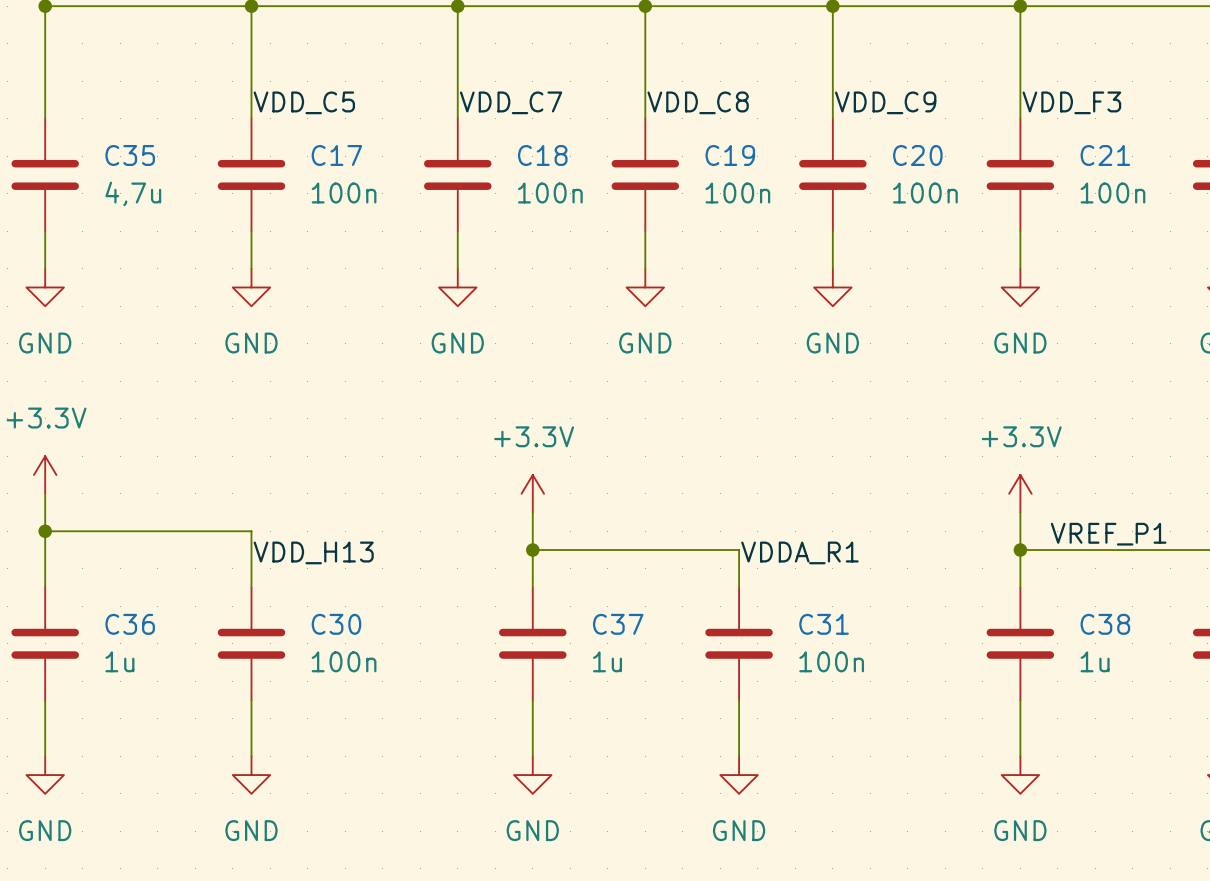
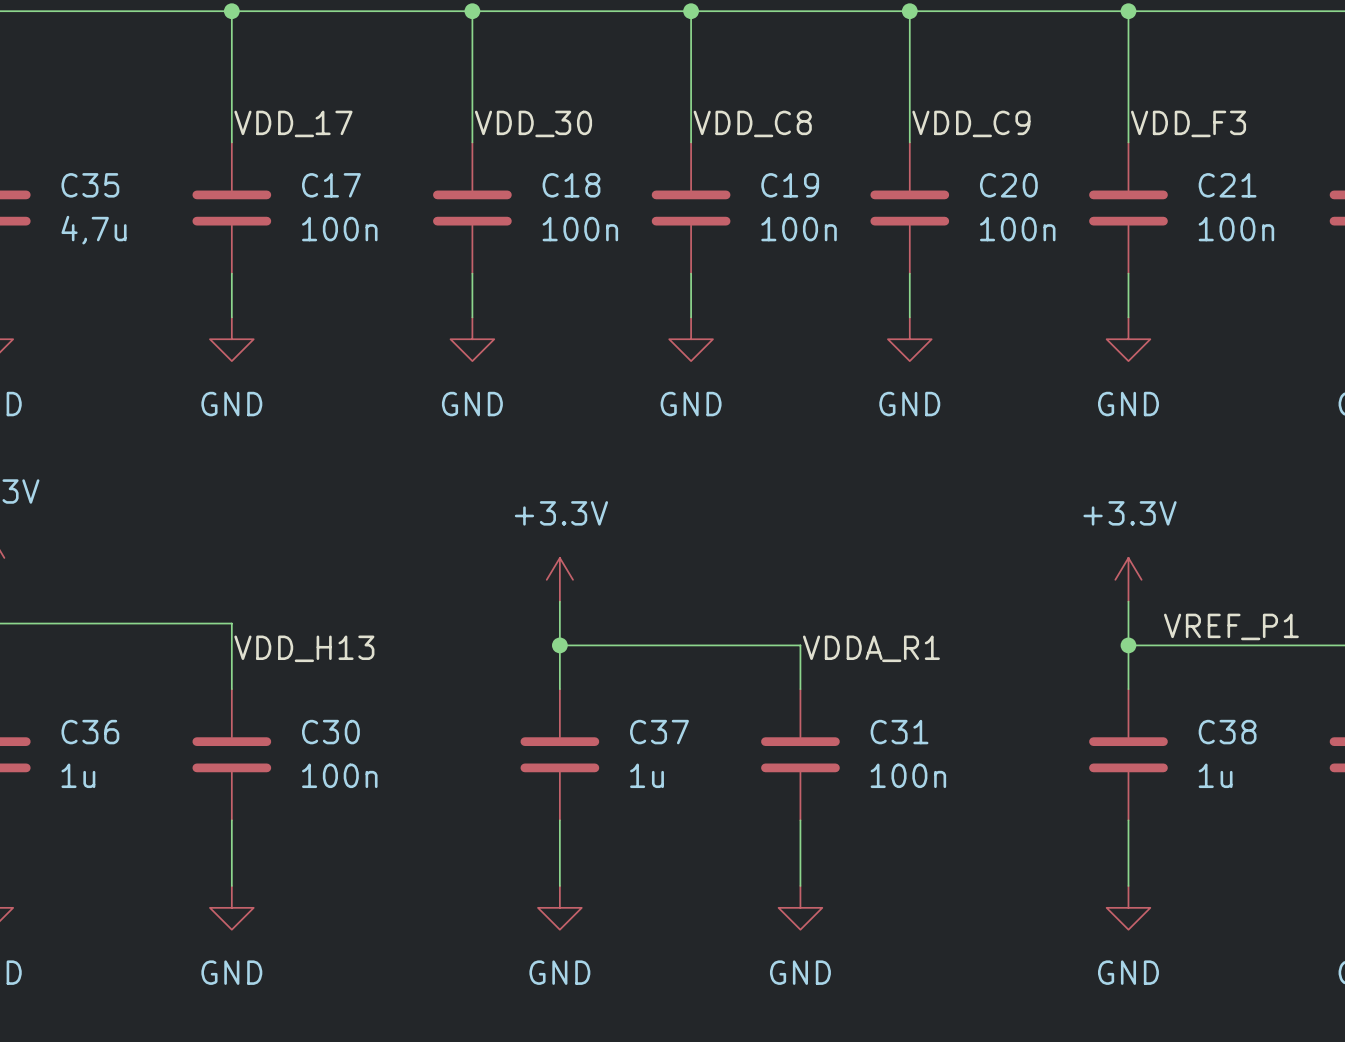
label: VDD_C5 (304, 102) -> VDD_17 (293, 123)
label: VDD_C7 (511, 102) -> VDD_30 (533, 123)

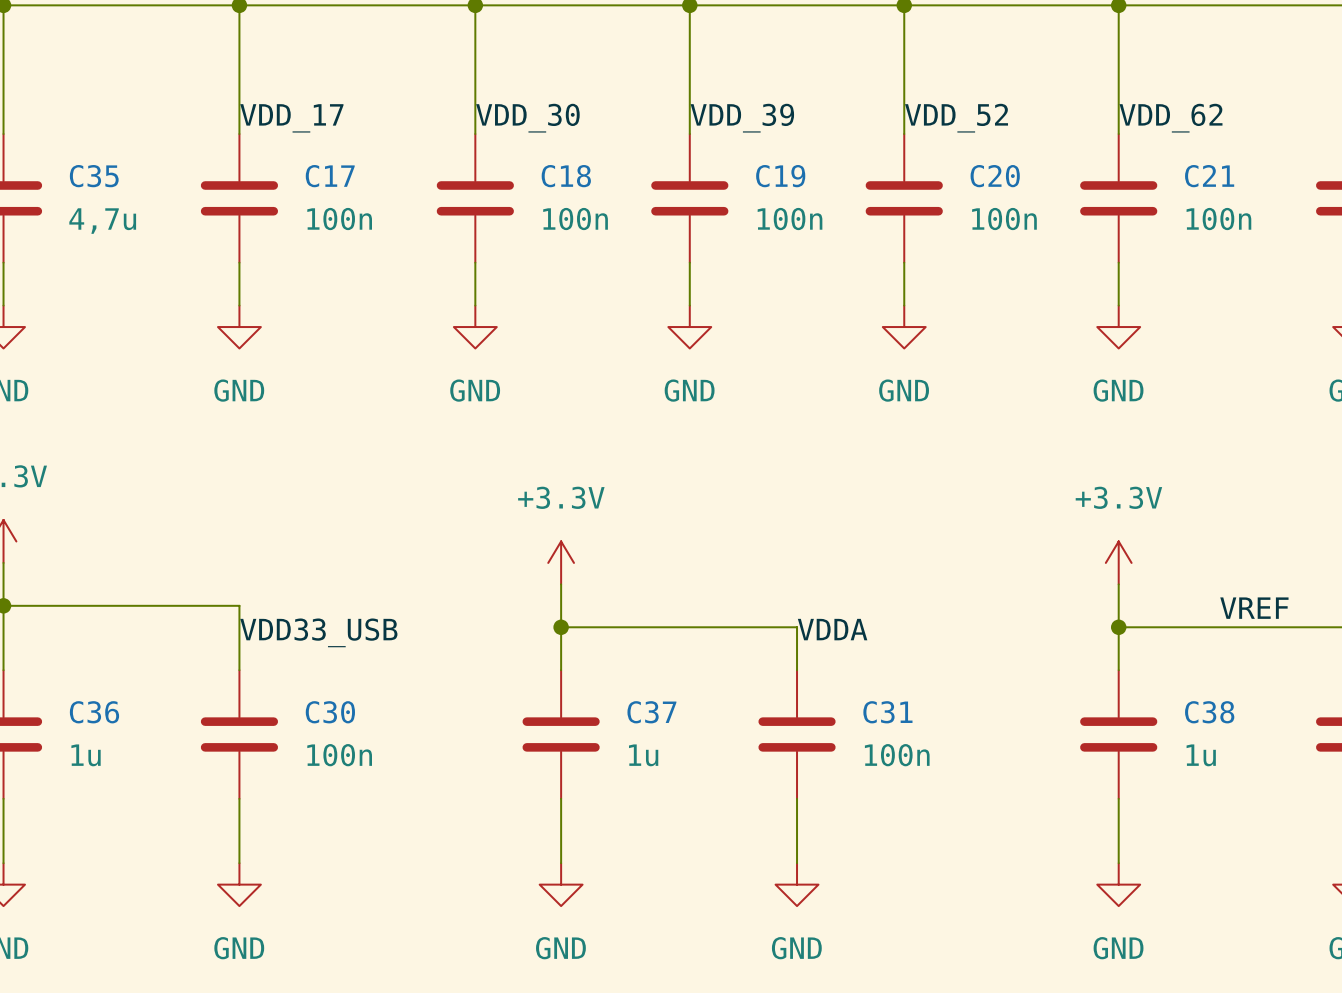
label: VDD_C8 (752, 123) -> VDD_39 (742, 118)
label: VDD_C9 (971, 123) -> VDD_52 (956, 118)
label: VDD_F3 (1188, 123) -> VDD_62 (1171, 118)
label: VREF_P1 (1231, 626) -> VREF (1254, 608)
label: VDD_H13 (304, 648) -> VDD33_USB (318, 632)
label: VDDA_R1 (871, 648) -> VDDA (832, 629)

